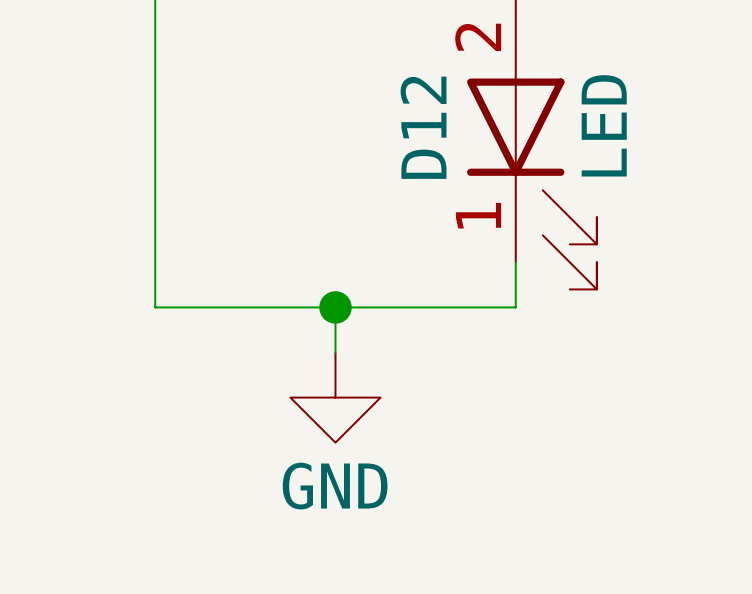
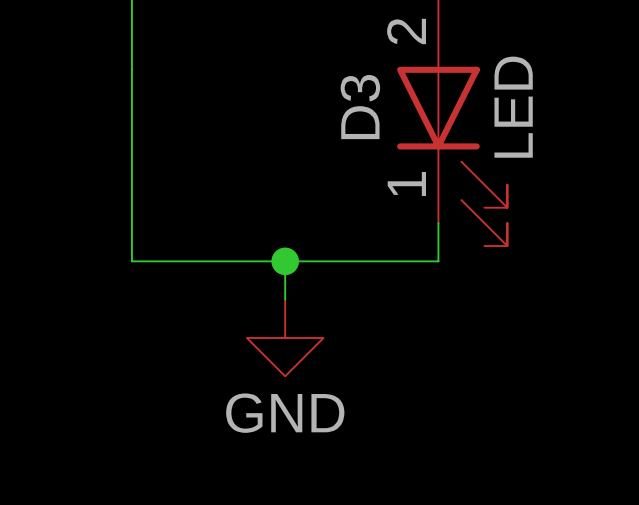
D12 name: D12 (423, 127) -> D3 (360, 107)

